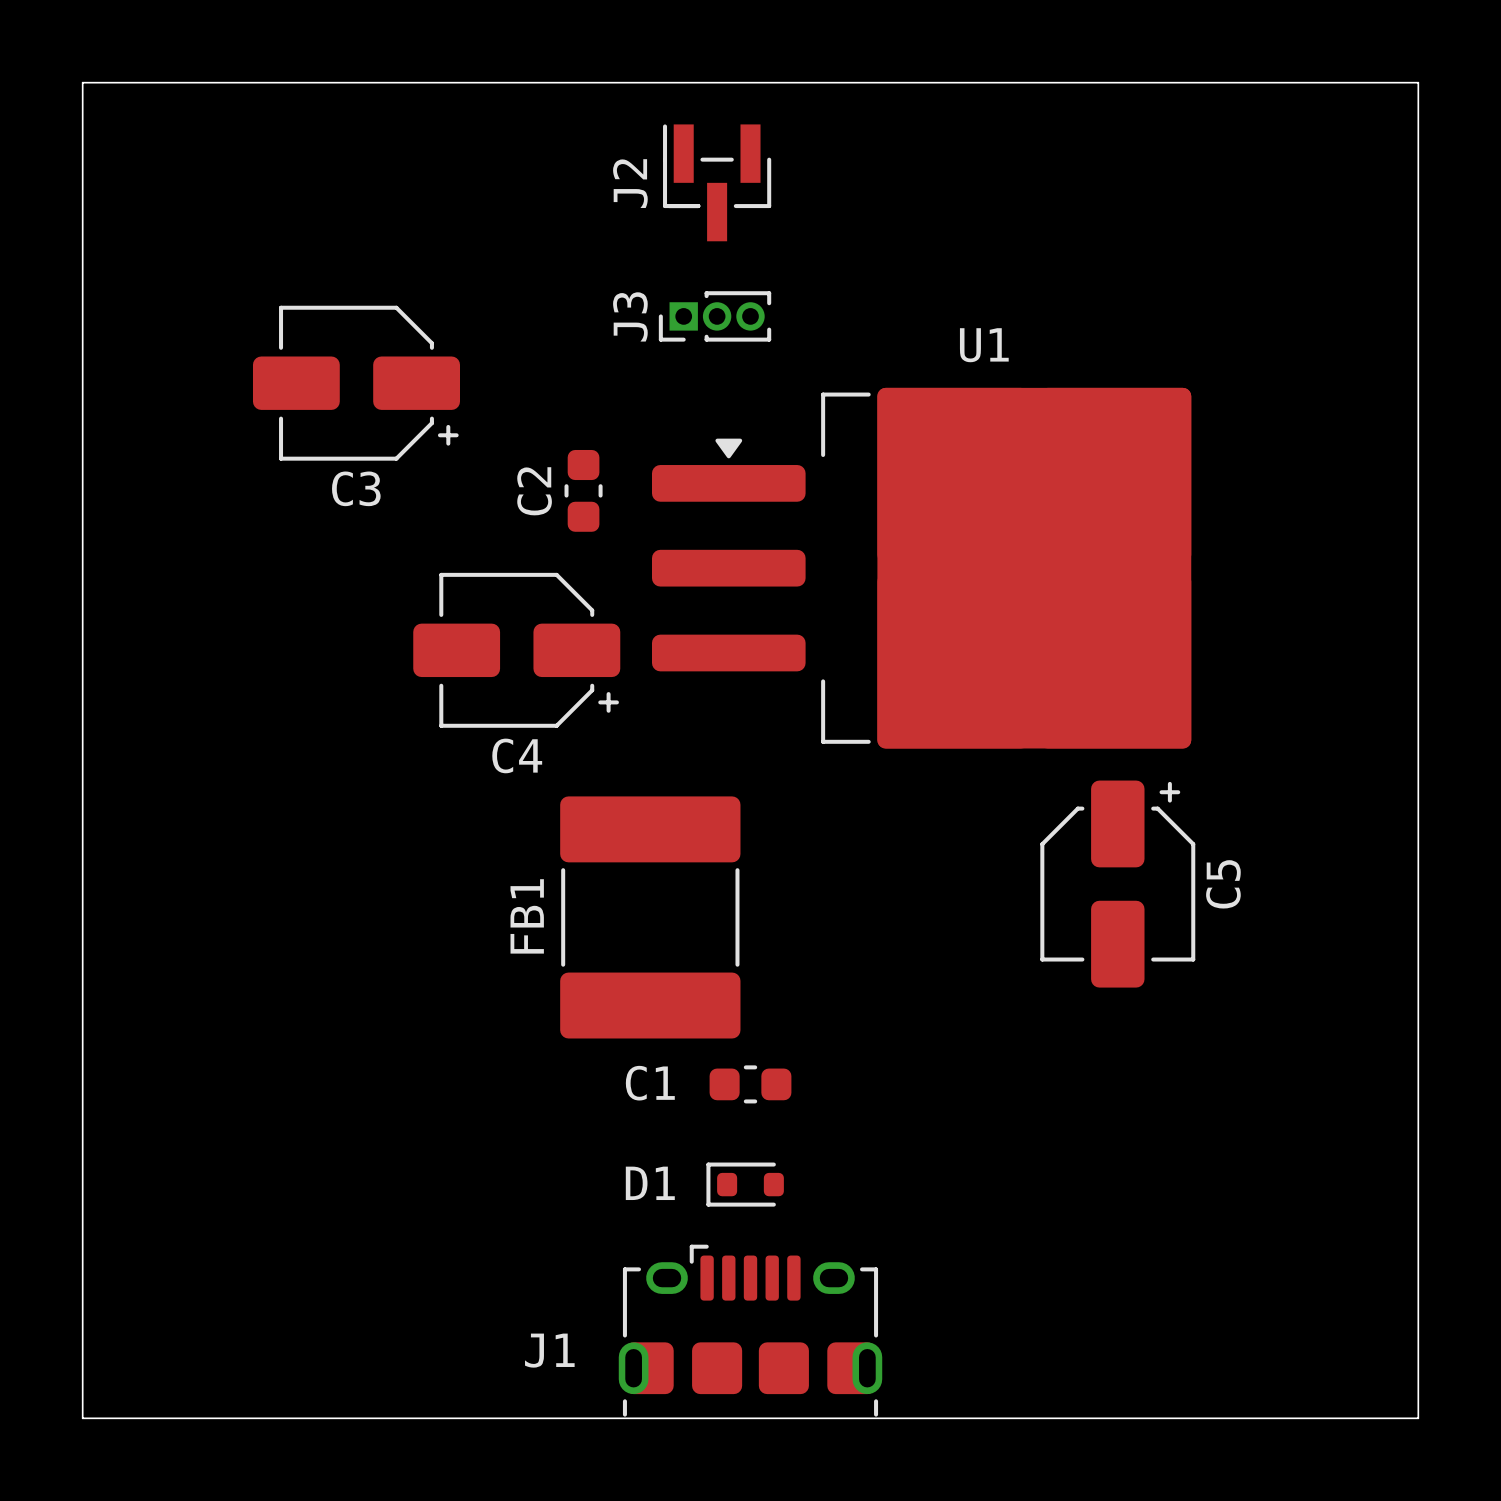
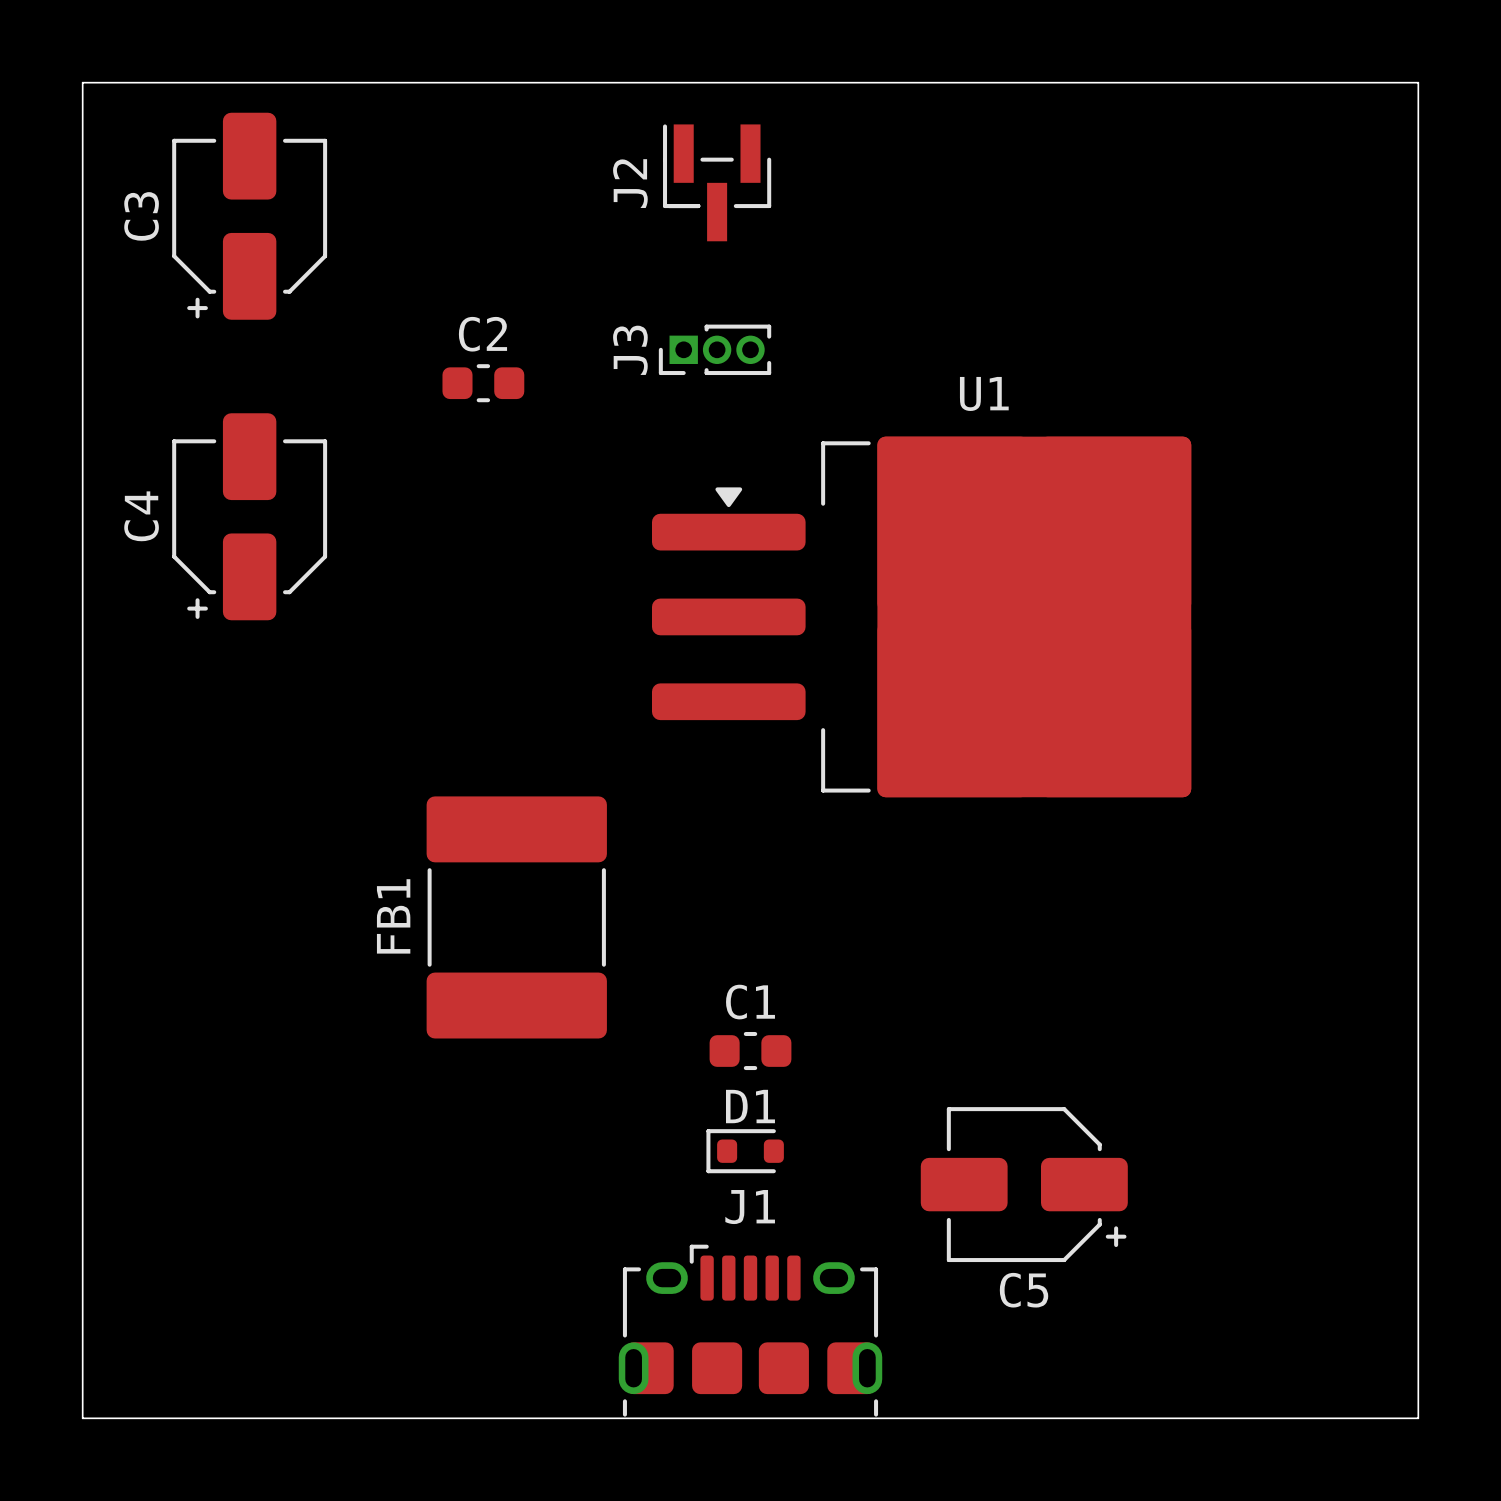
J3 position: (715, 316) -> (715, 349)
C3 rotation: 0° (356, 383) -> 90° clockwise (249, 216)
C3 position: (356, 383) -> (249, 216)
C2 rotation: 0° (583, 490) -> 90° clockwise (483, 383)
C2 position: (583, 490) -> (483, 383)
U1 position: (921, 568) -> (921, 616)
C4 rotation: 0° (516, 650) -> 90° clockwise (249, 516)
C4 position: (516, 650) -> (249, 516)
C5 rotation: 0° (1117, 884) -> 90° clockwise (1024, 1184)
C5 position: (1117, 884) -> (1024, 1184)
FB1 position: (650, 917) -> (516, 917)
C1 name position: C1 (650, 1083) -> C1 (750, 1002)
C1 position: (750, 1084) -> (750, 1051)
D1 name position: D1 (650, 1183) -> D1 (750, 1106)
D1 position: (745, 1184) -> (745, 1151)
J1 name position: J1 (549, 1350) -> J1 (750, 1207)

